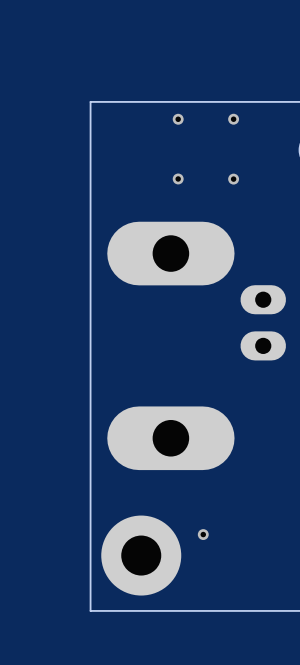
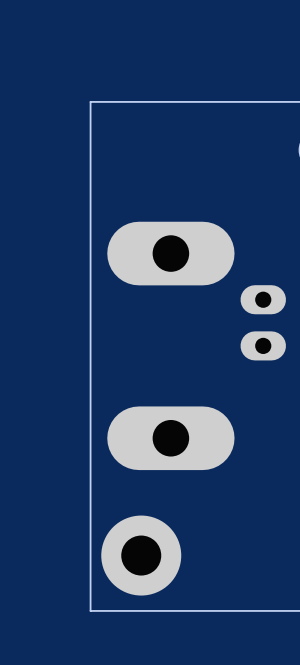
via: (178, 119) -> none
via: (233, 119) -> none
via: (178, 178) -> none
via: (233, 179) -> none
via: (203, 534) -> none

